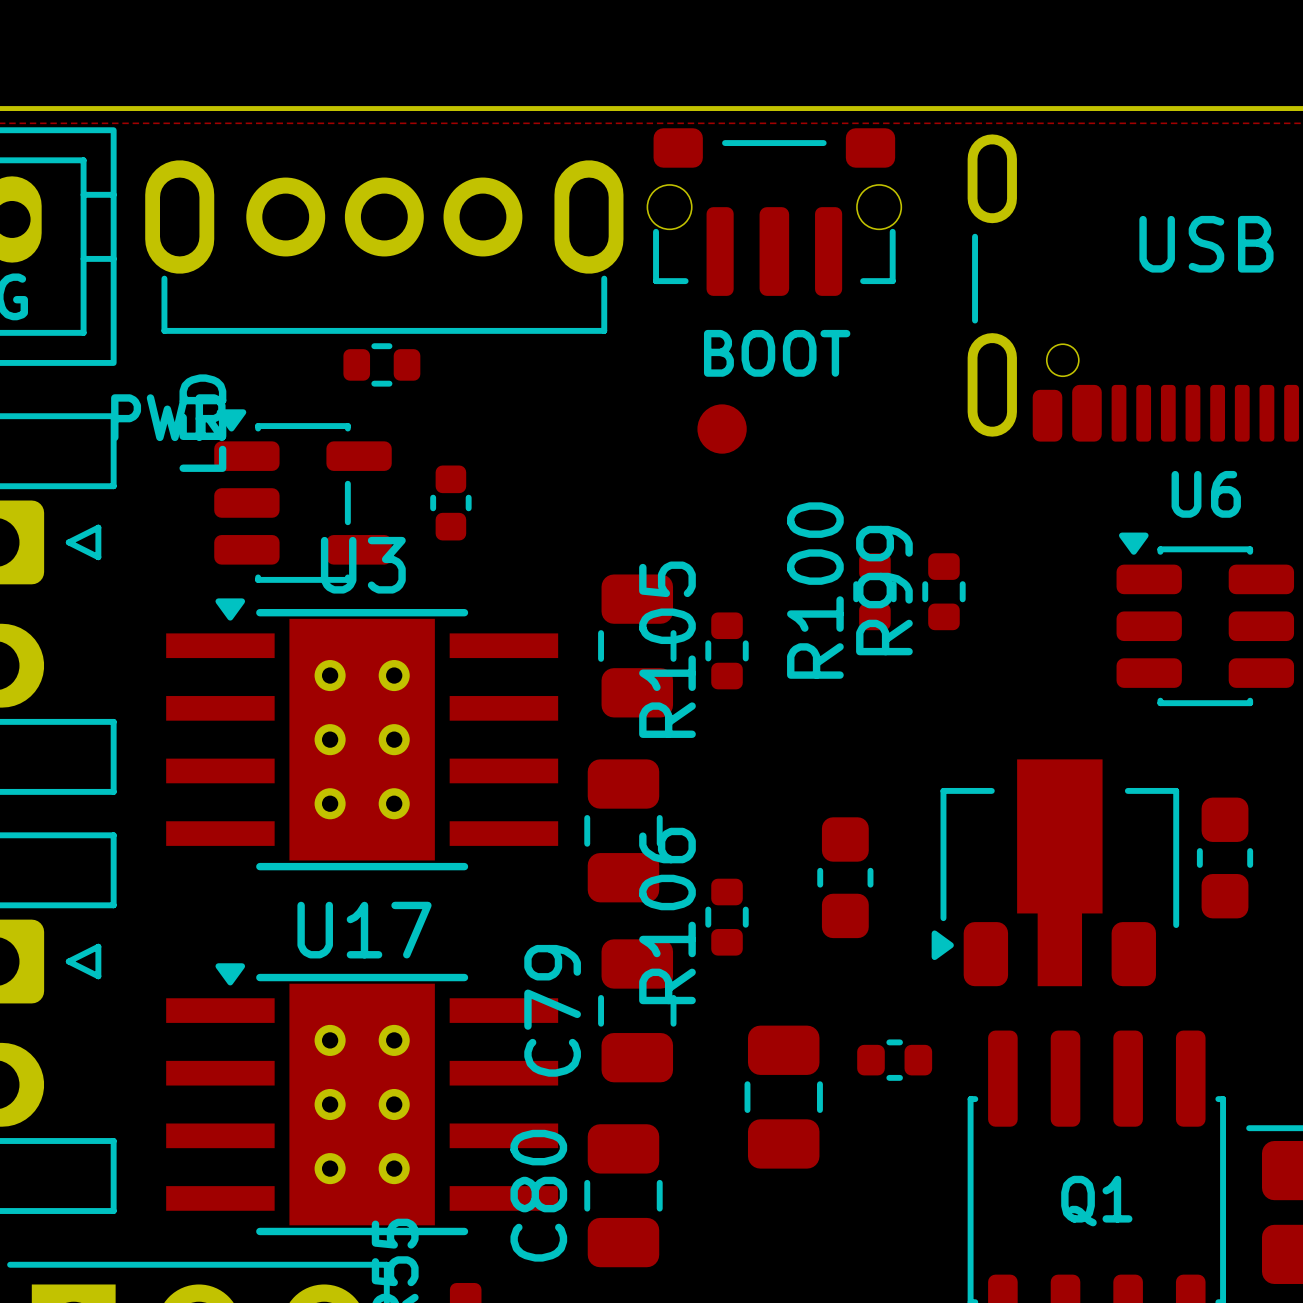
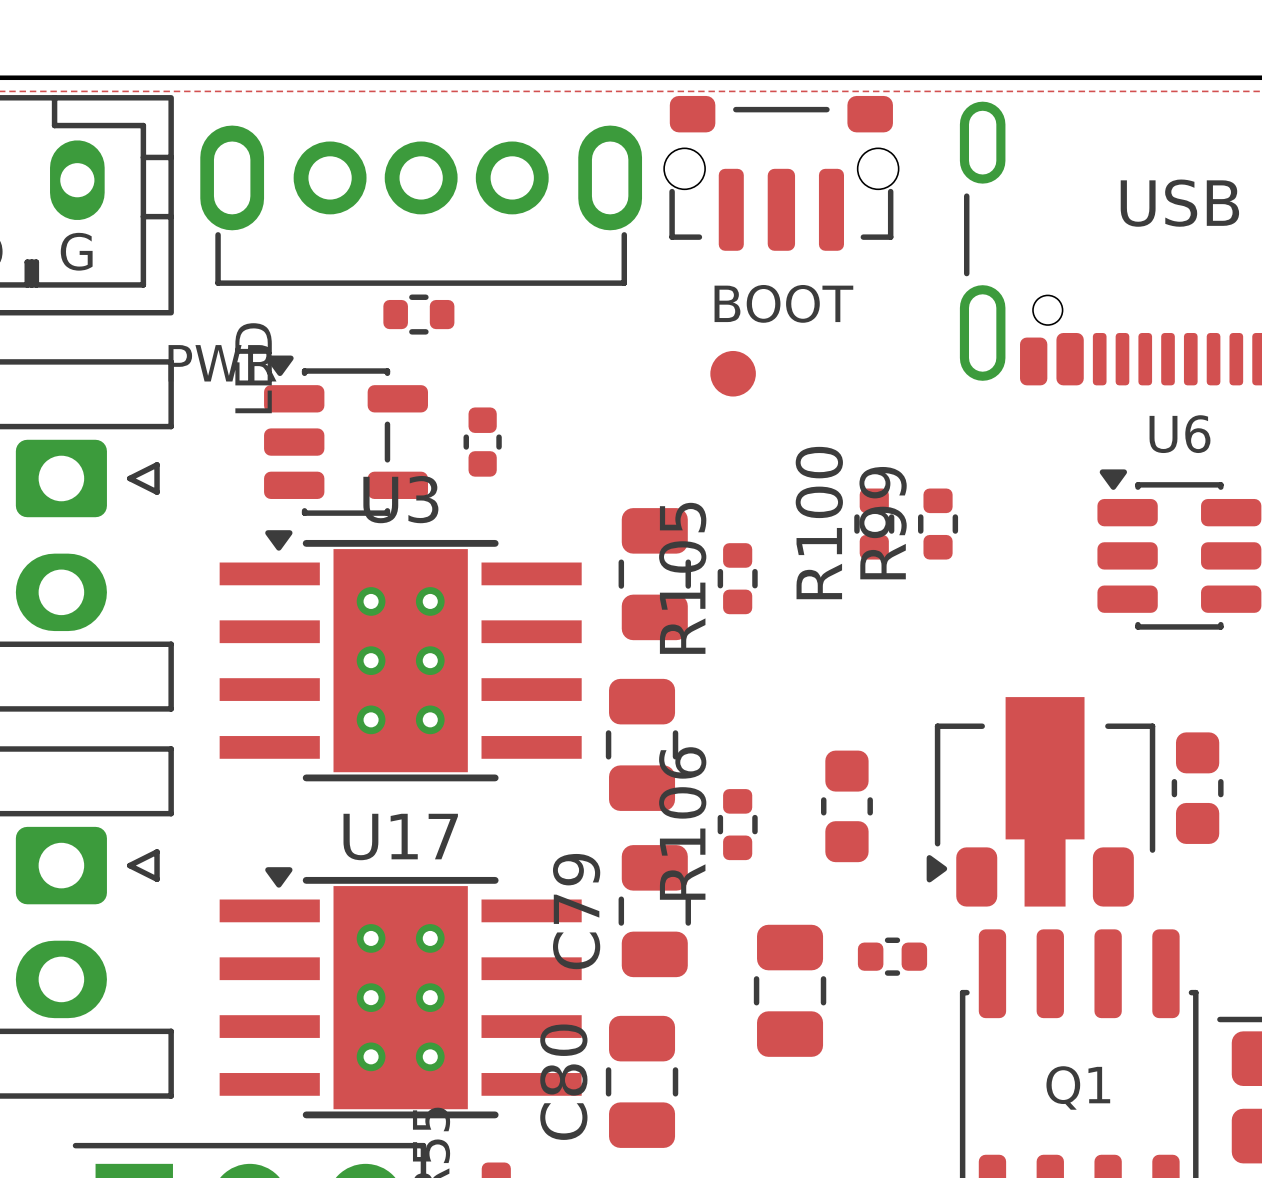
part position: (1225, 857) -> (1197, 788)
part position: (1055, 872) -> (1040, 801)
part position: (845, 877) -> (846, 806)

